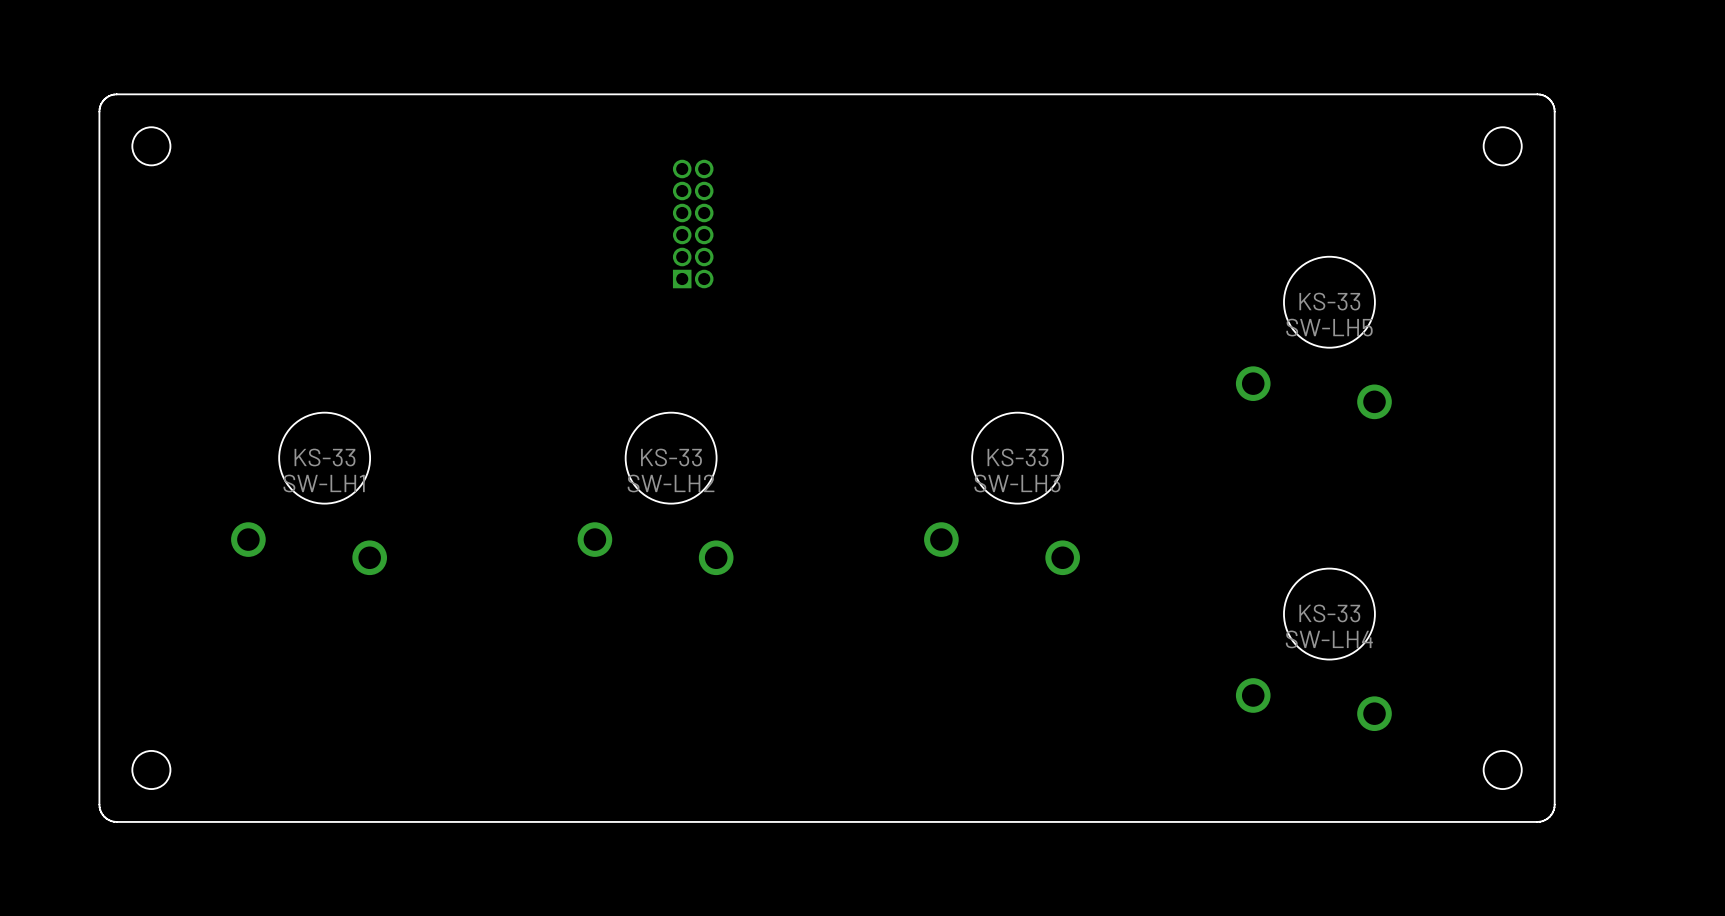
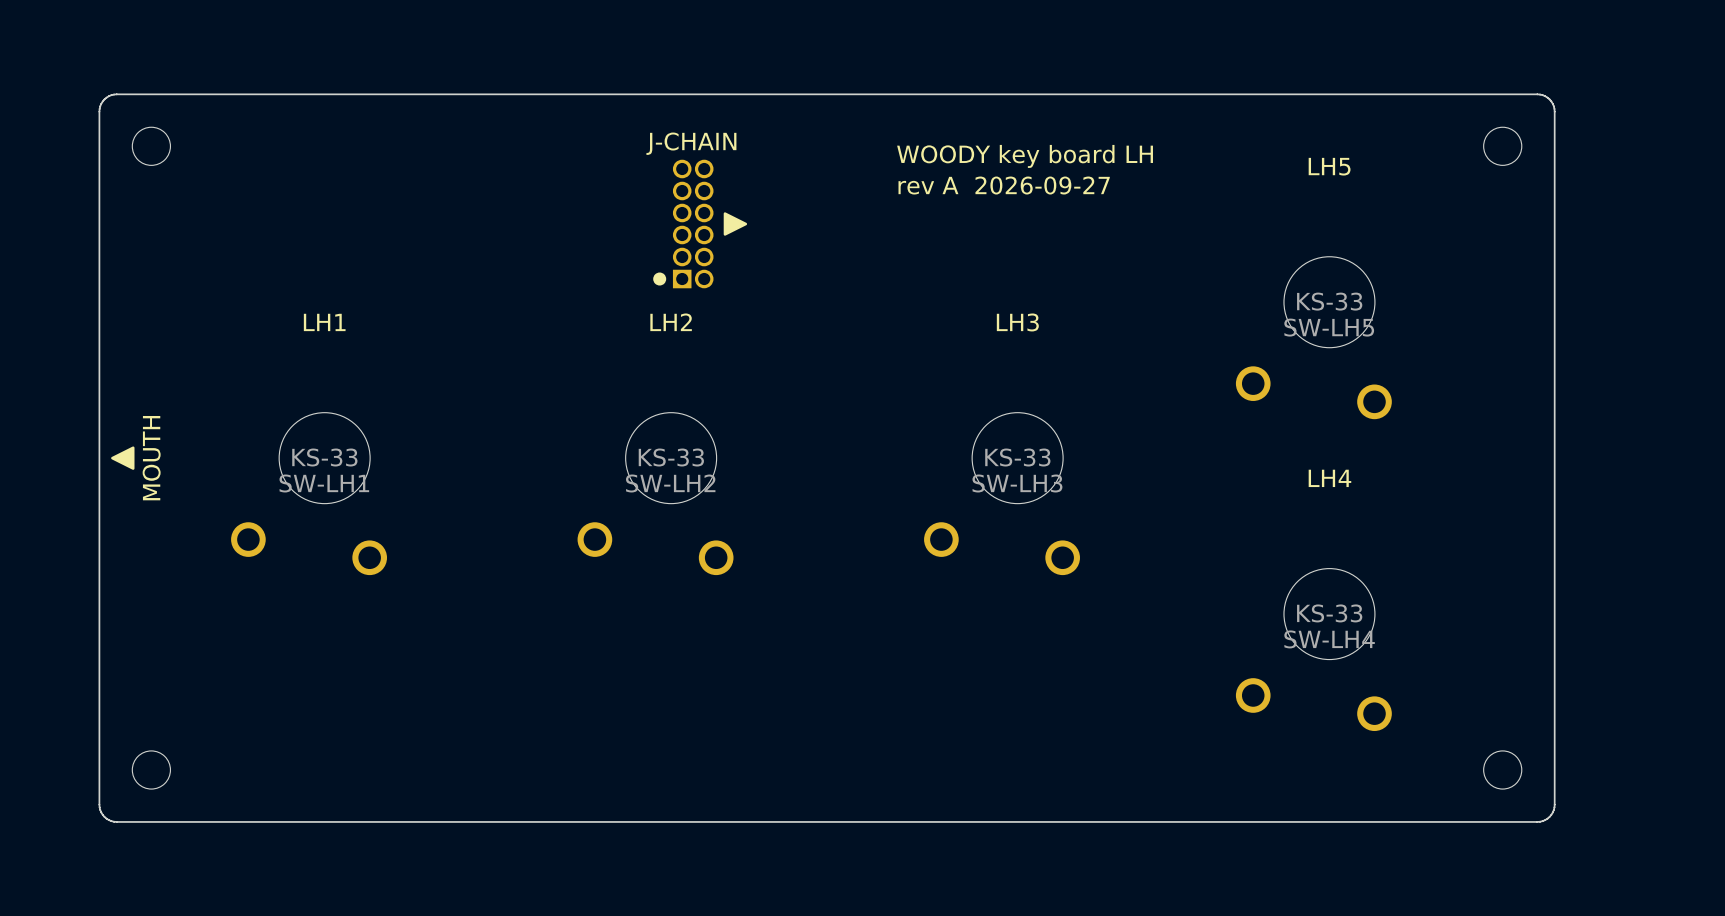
text: none -> J-CHAIN (691, 143)
text: none -> WOODY key board LH (1025, 156)
text: none -> LH5 (1329, 166)
text: none -> rev A 2026-09-27 (1004, 185)
drawing: none -> [723, 212, 748, 236]
drawing: none -> [653, 272, 667, 286]
text: none -> LH1 (324, 322)
text: none -> LH2 (671, 322)
text: none -> LH3 (1017, 322)
drawing: none -> [111, 446, 135, 470]
text: none -> MOUTH (151, 458)
text: none -> LH4 (1329, 478)

